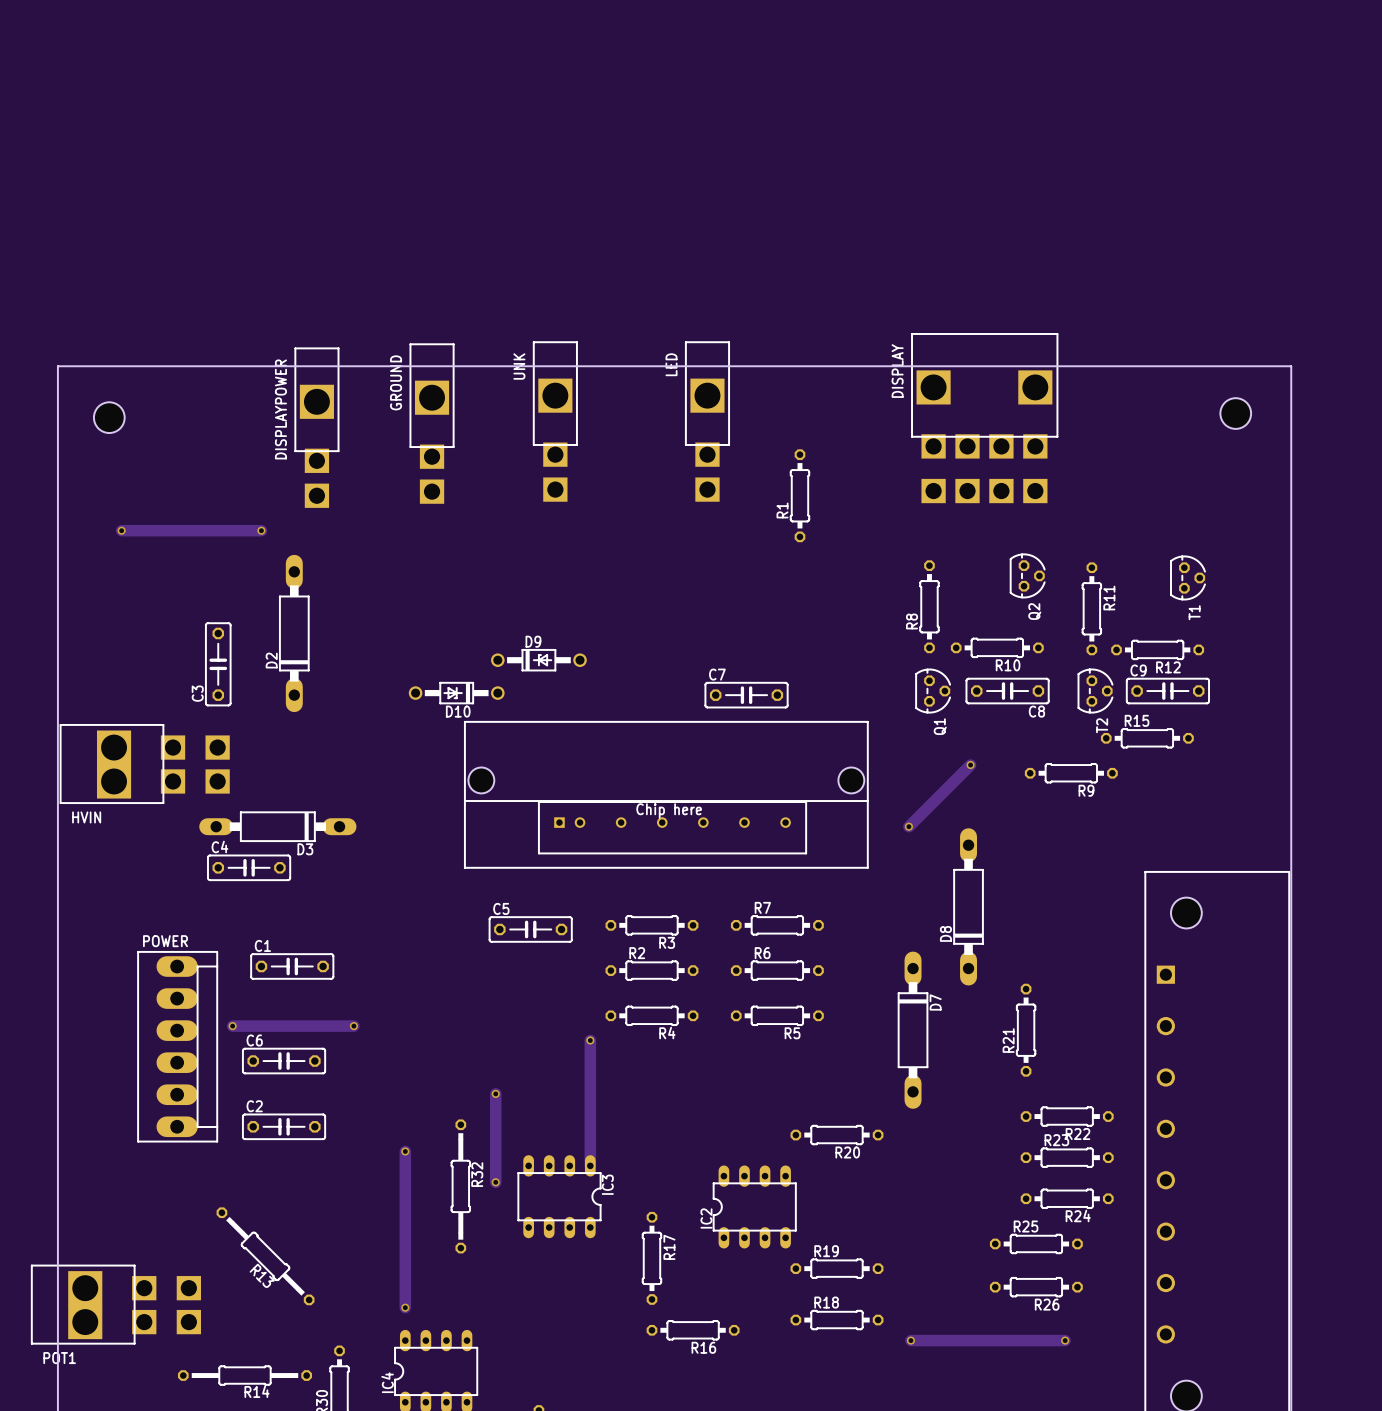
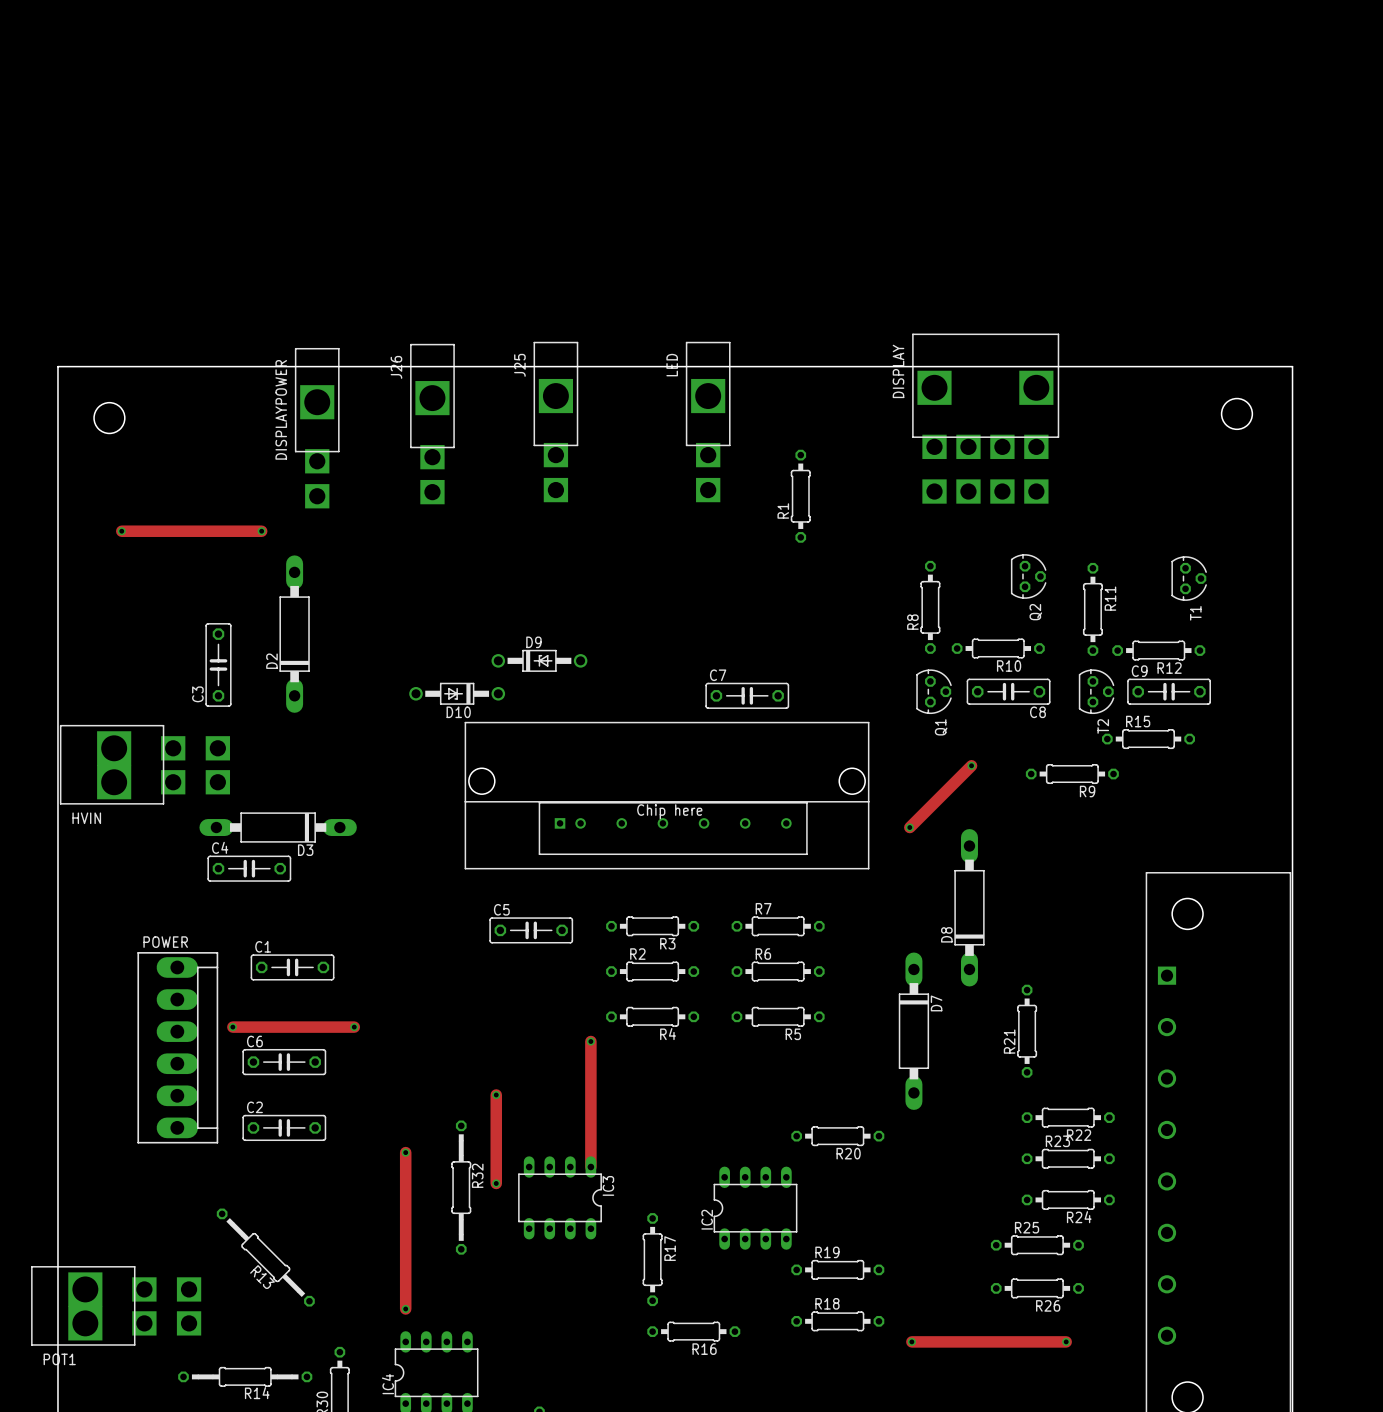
UNK name: UNK (519, 366) -> J25 (519, 365)
GROUND name: GROUND (396, 382) -> J26 (396, 367)

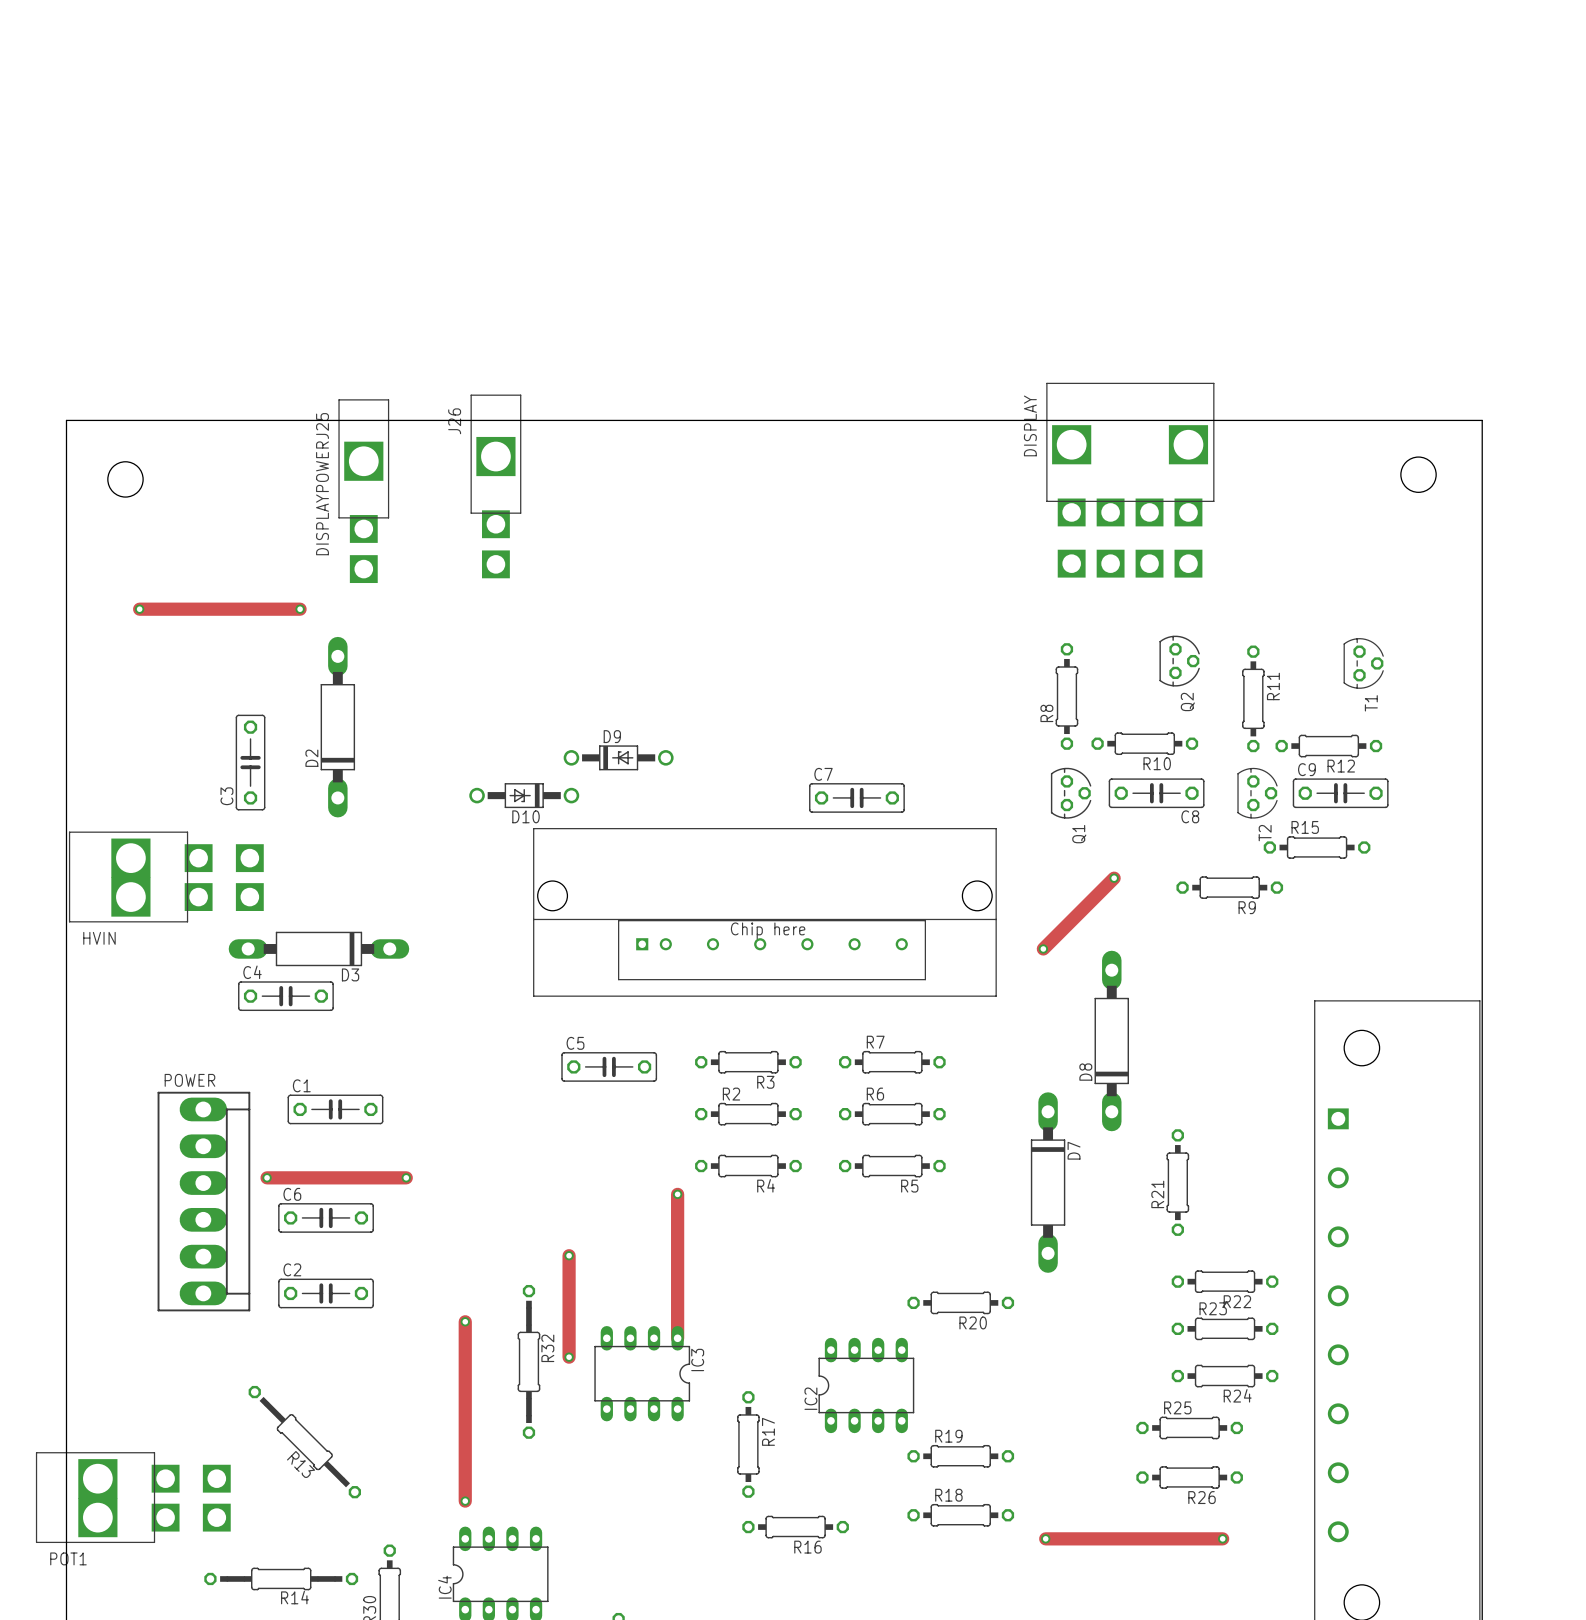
DISPLAYPOWER name: DISPLAYPOWER (281, 409) -> DISPLAYPOWERJ25 (322, 484)
J25: (555, 422) -> none
LED: (708, 422) -> none
R1: (800, 496) -> none

